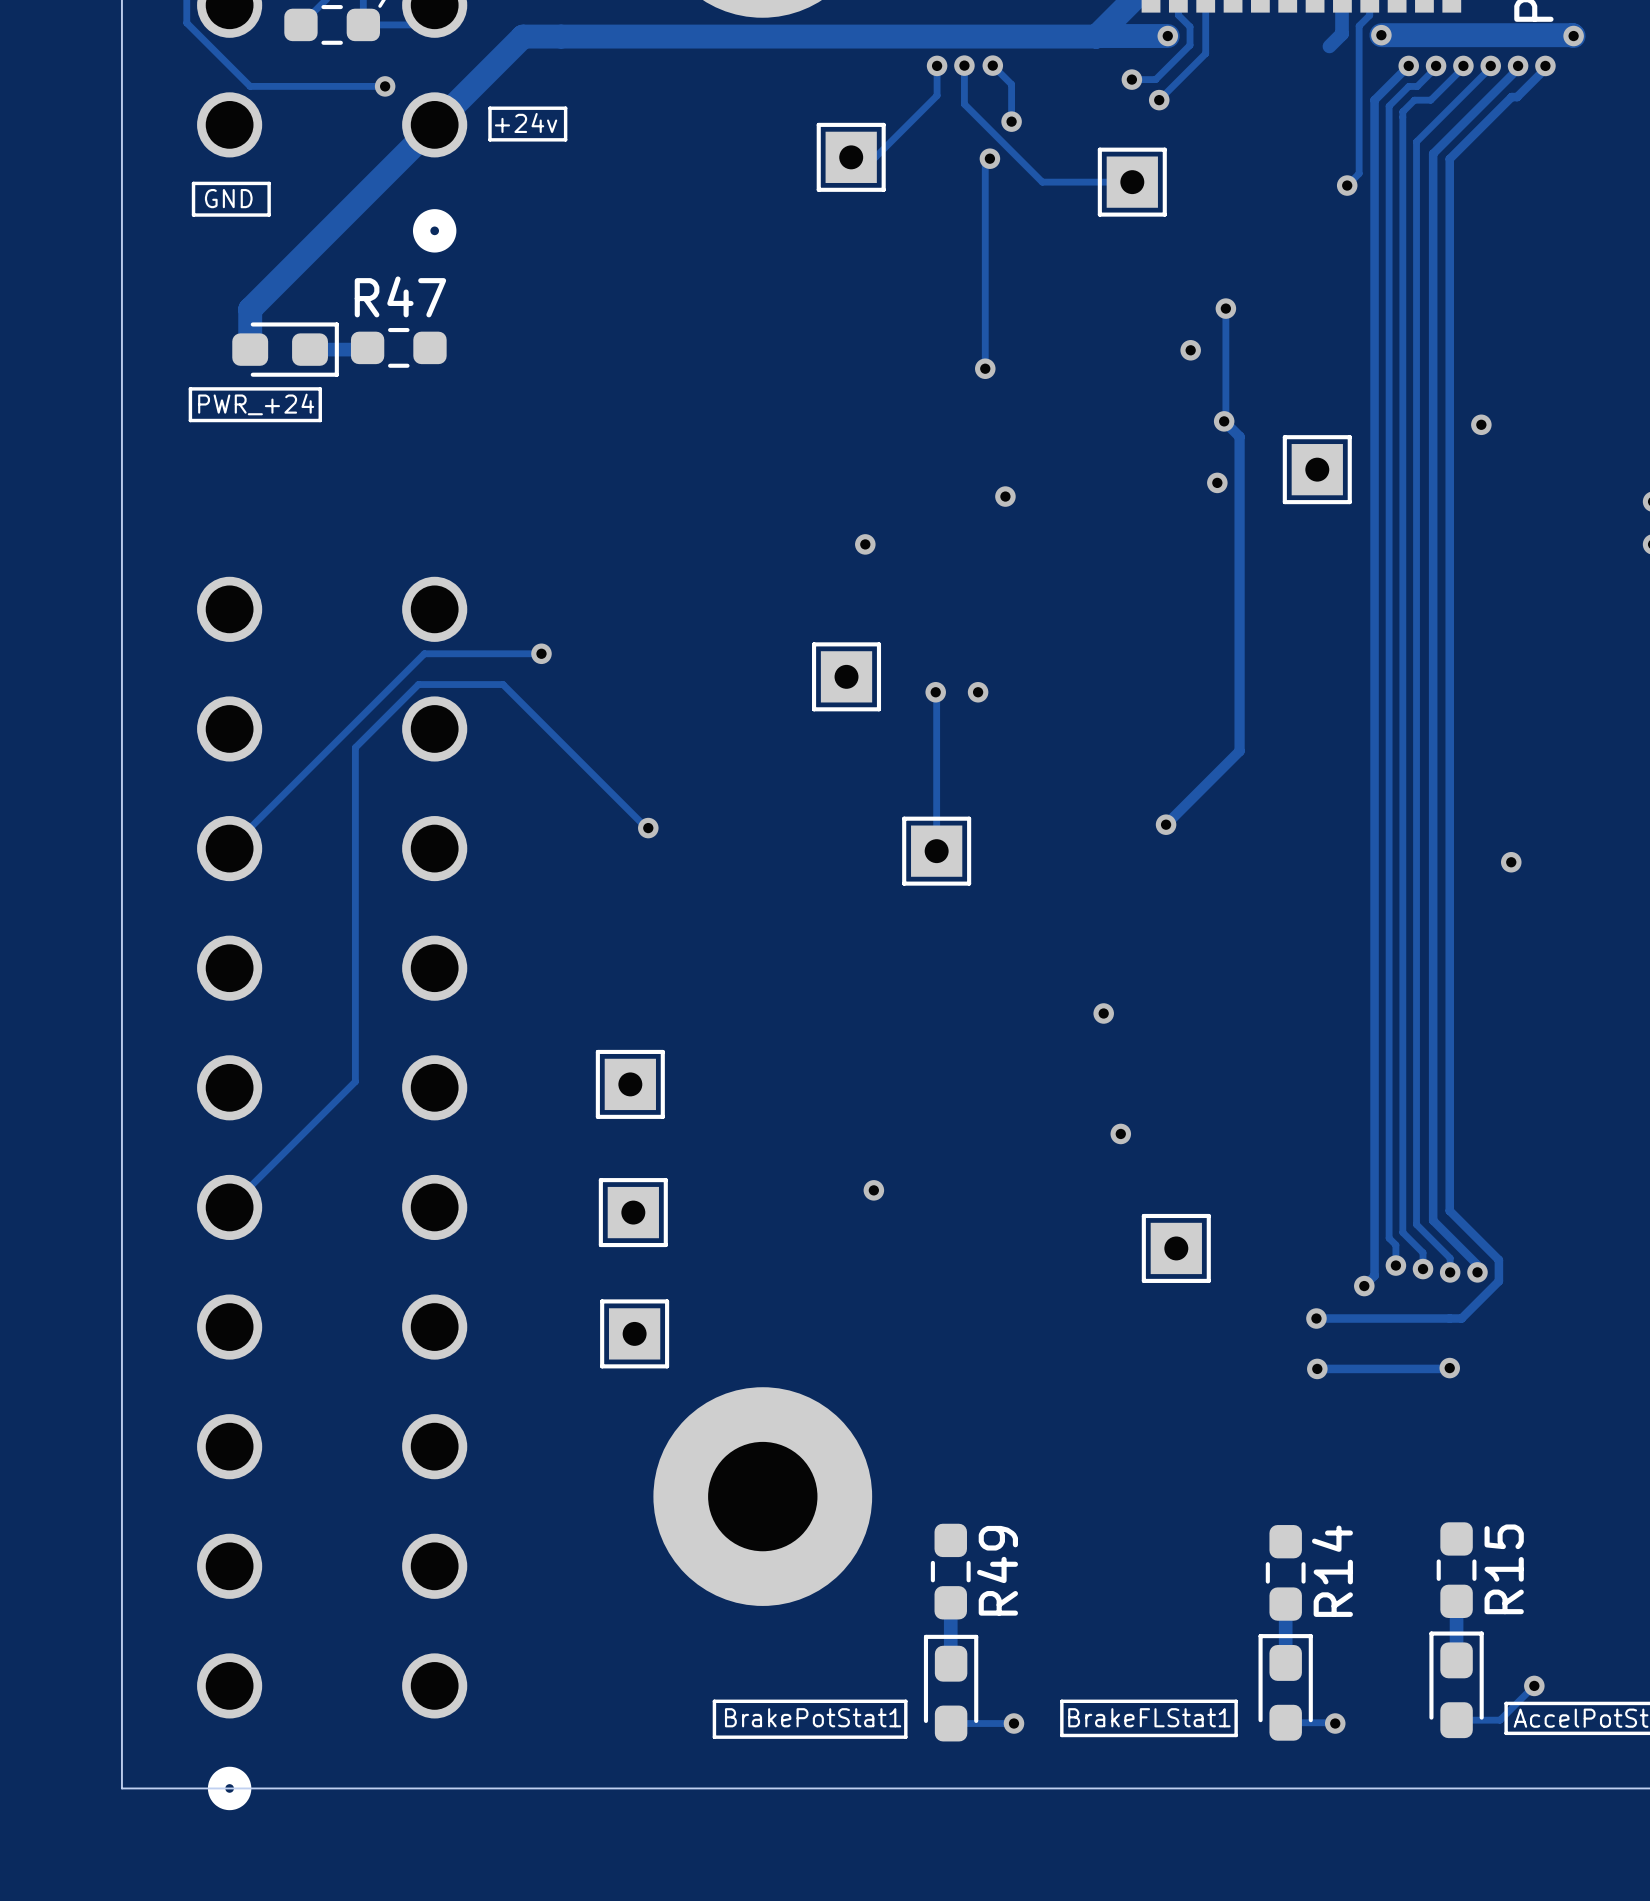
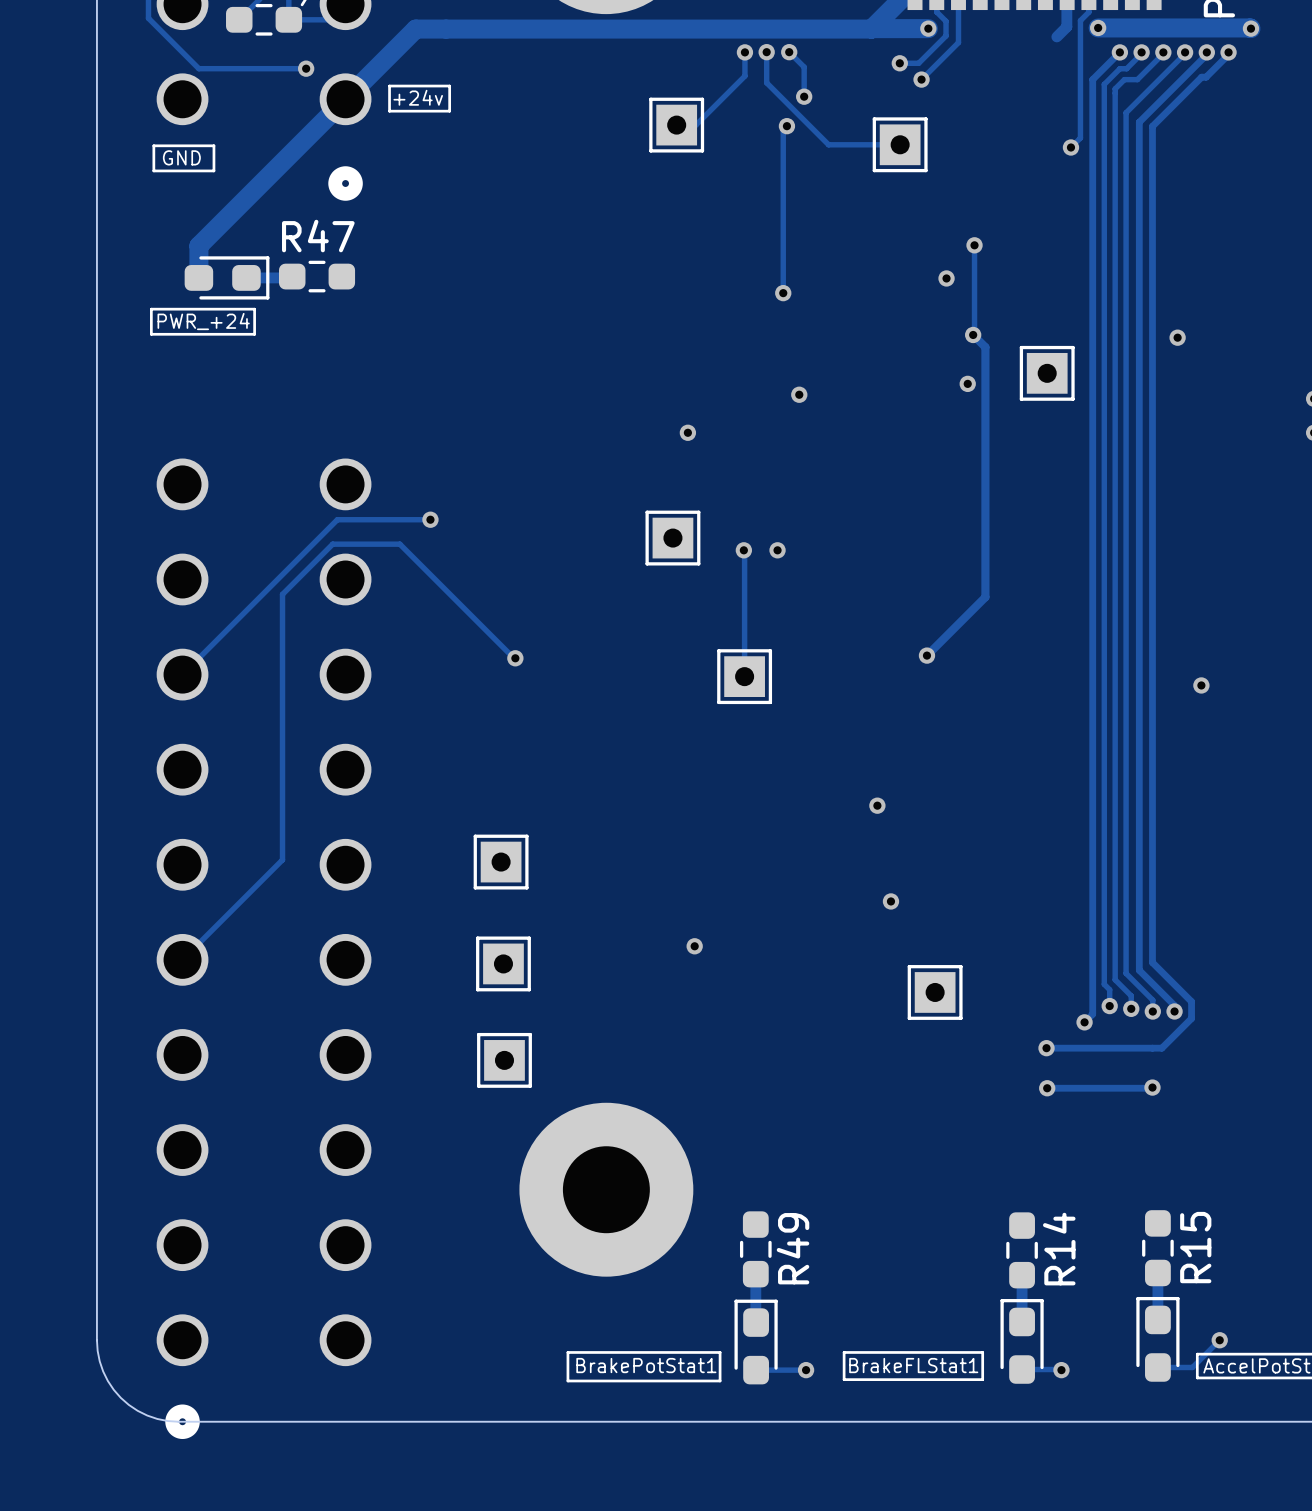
board edge: (121, 1685) (121, 1788) (224, 1788) -> (96, 1340) (103, 1371) (120, 1397) (147, 1415) (178, 1421)

